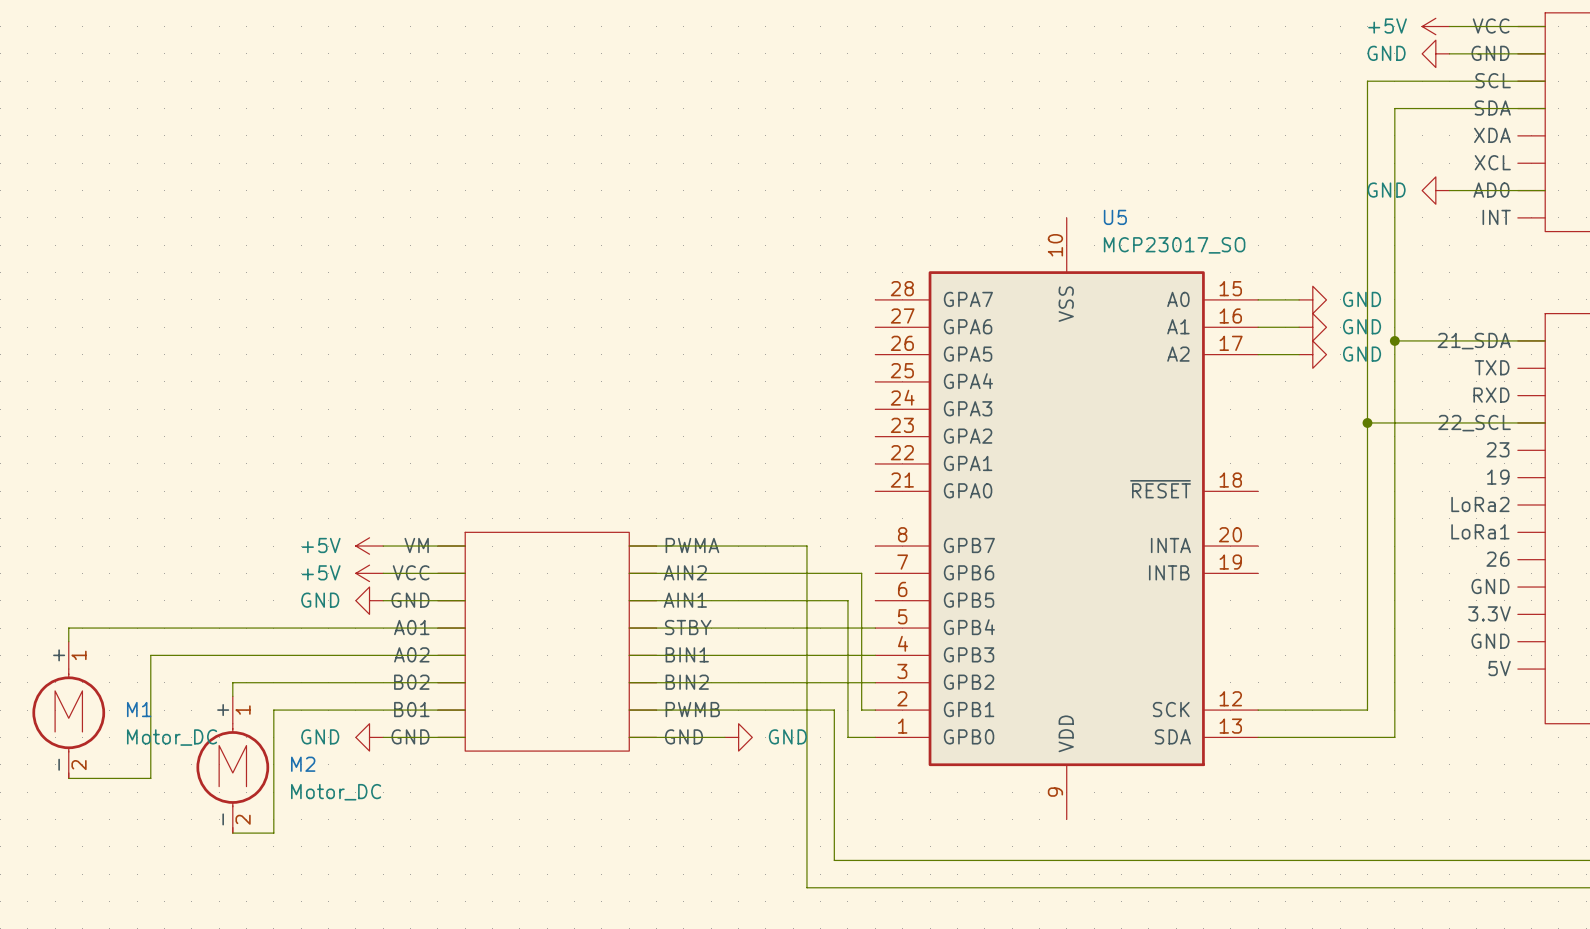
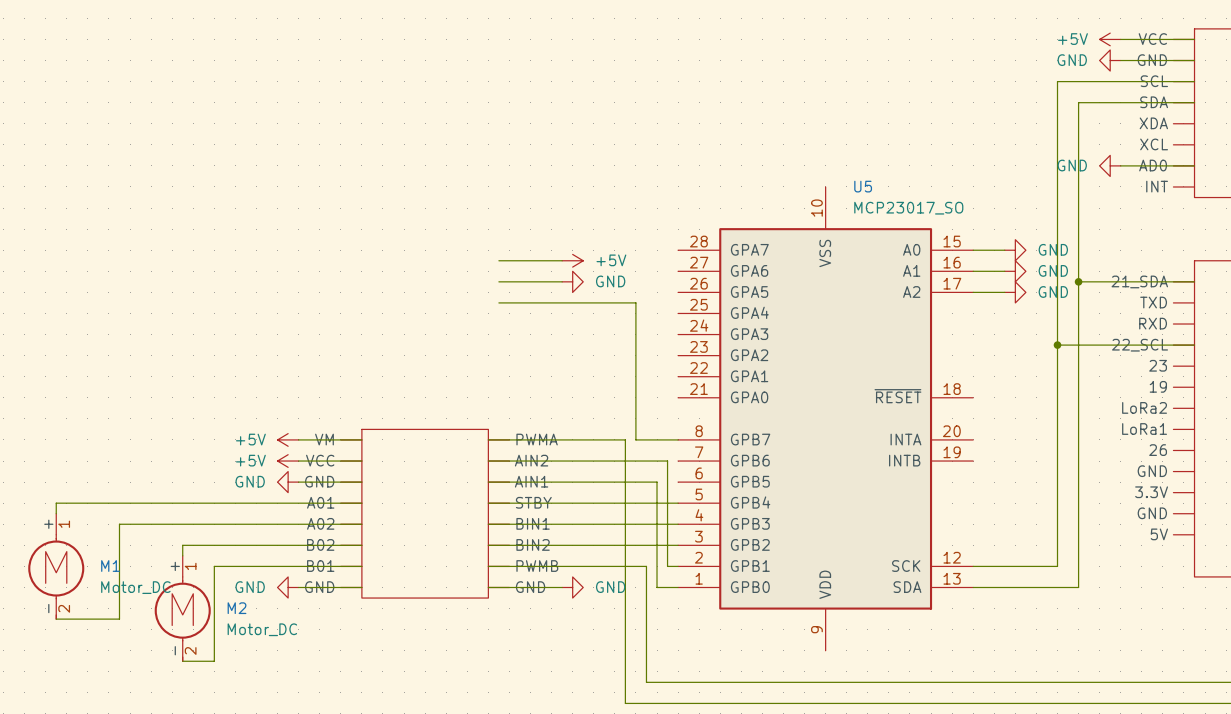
wire: none -> (498, 260) (562, 260)
power symbol: none -> +5V (572, 260)
wire: none -> (498, 281) (562, 281)
power symbol: none -> GND (572, 281)
wire: none -> (498, 302) (635, 302) (635, 439) (678, 439)

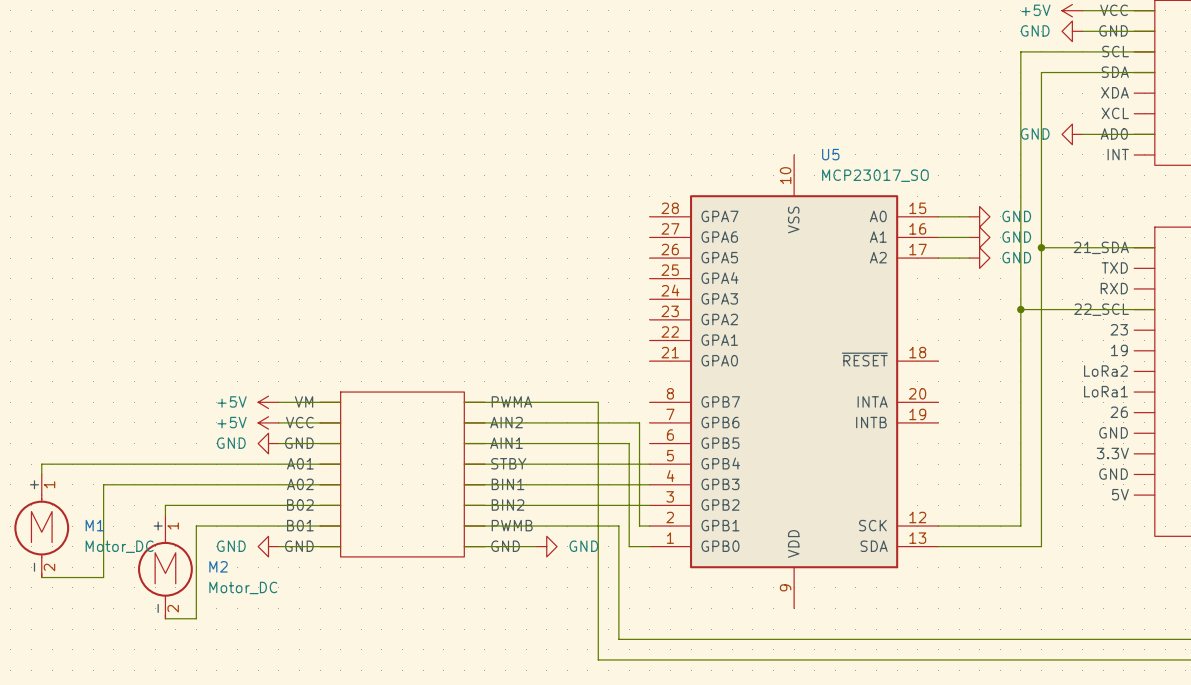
wire: (498, 260) (562, 260) -> none
power symbol: +5V (572, 260) -> none
wire: (498, 281) (562, 281) -> none
power symbol: GND (572, 281) -> none
wire: (498, 302) (635, 302) (635, 439) (678, 439) -> none

